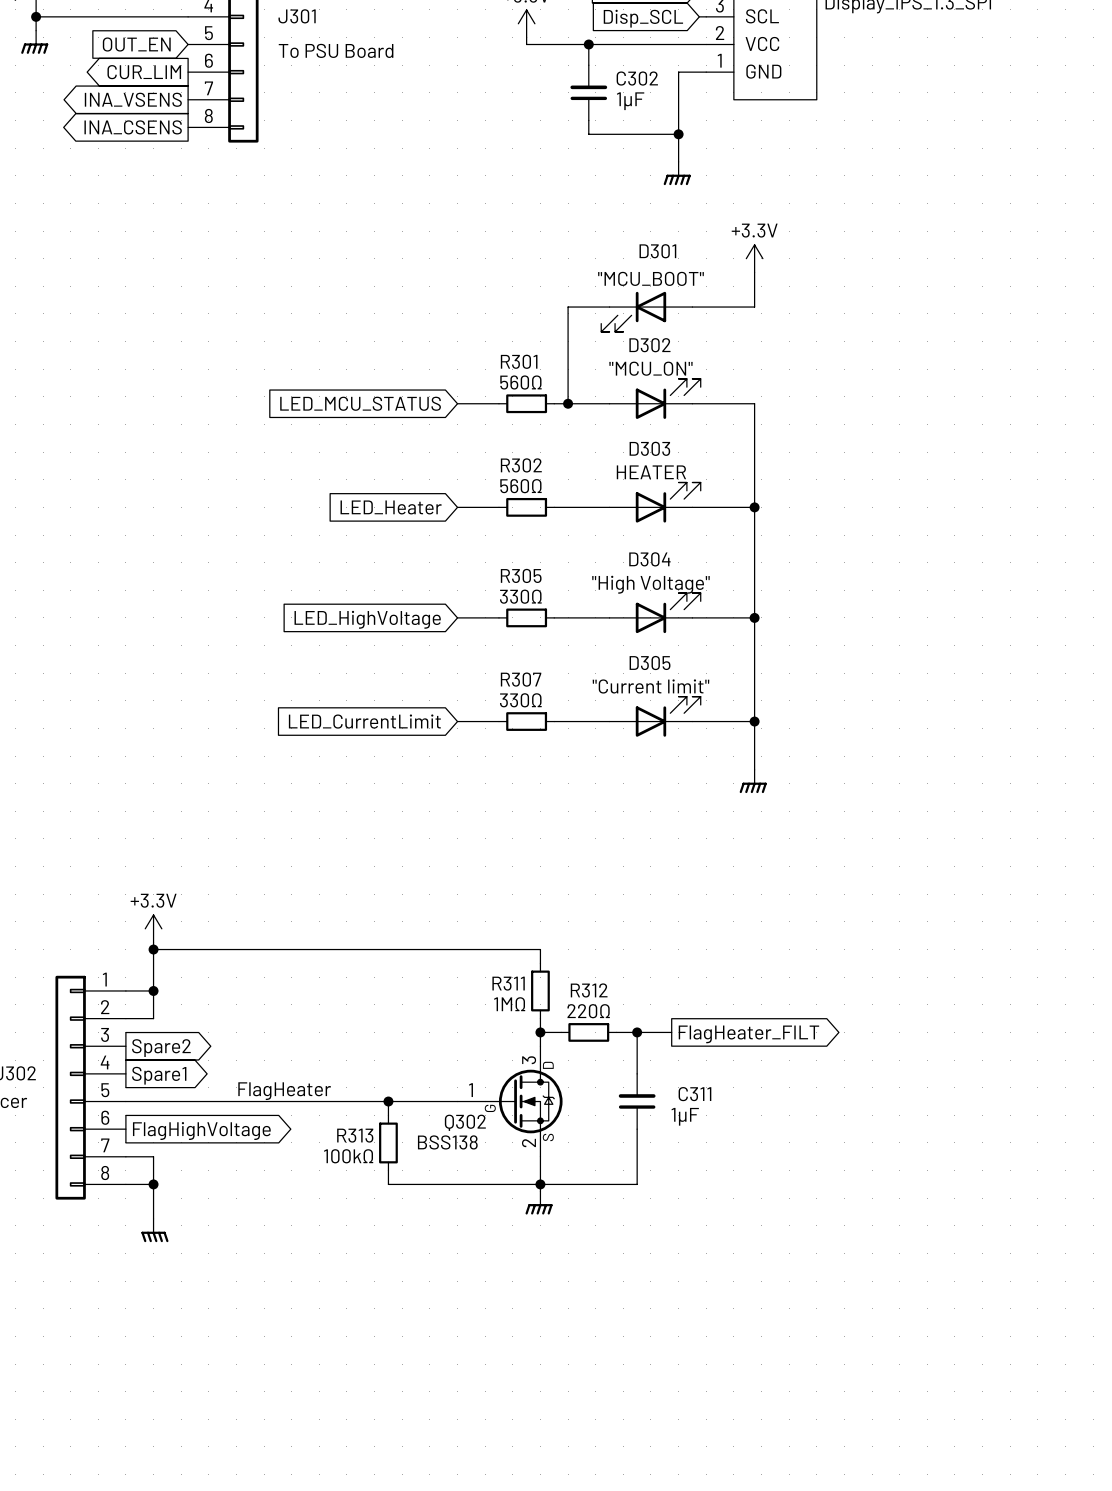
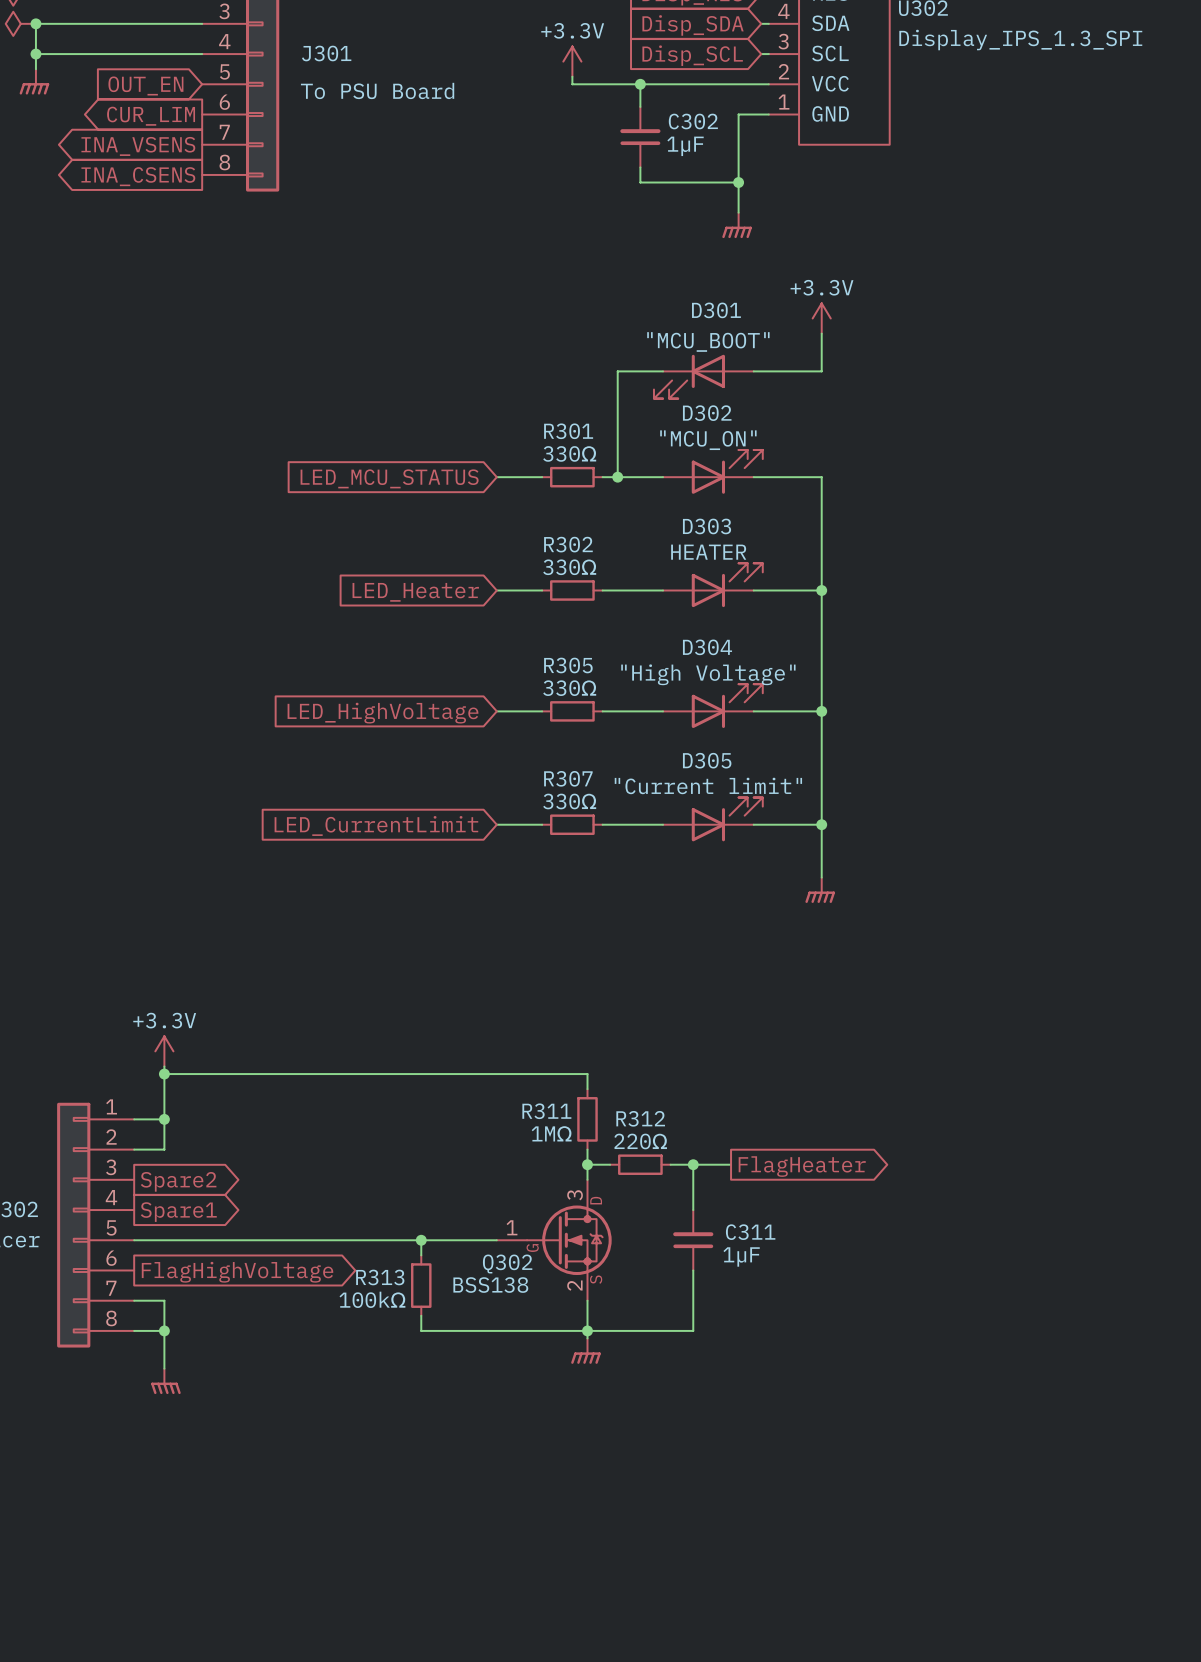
R301 value: 560Ω (520, 382) -> 330Ω (569, 453)
R302 value: 560Ω (520, 486) -> 330Ω (569, 567)
global label: FlagHeater_FILT (748, 1034) -> FlagHeater (802, 1166)
label: FlagHeater (284, 1091) -> none

